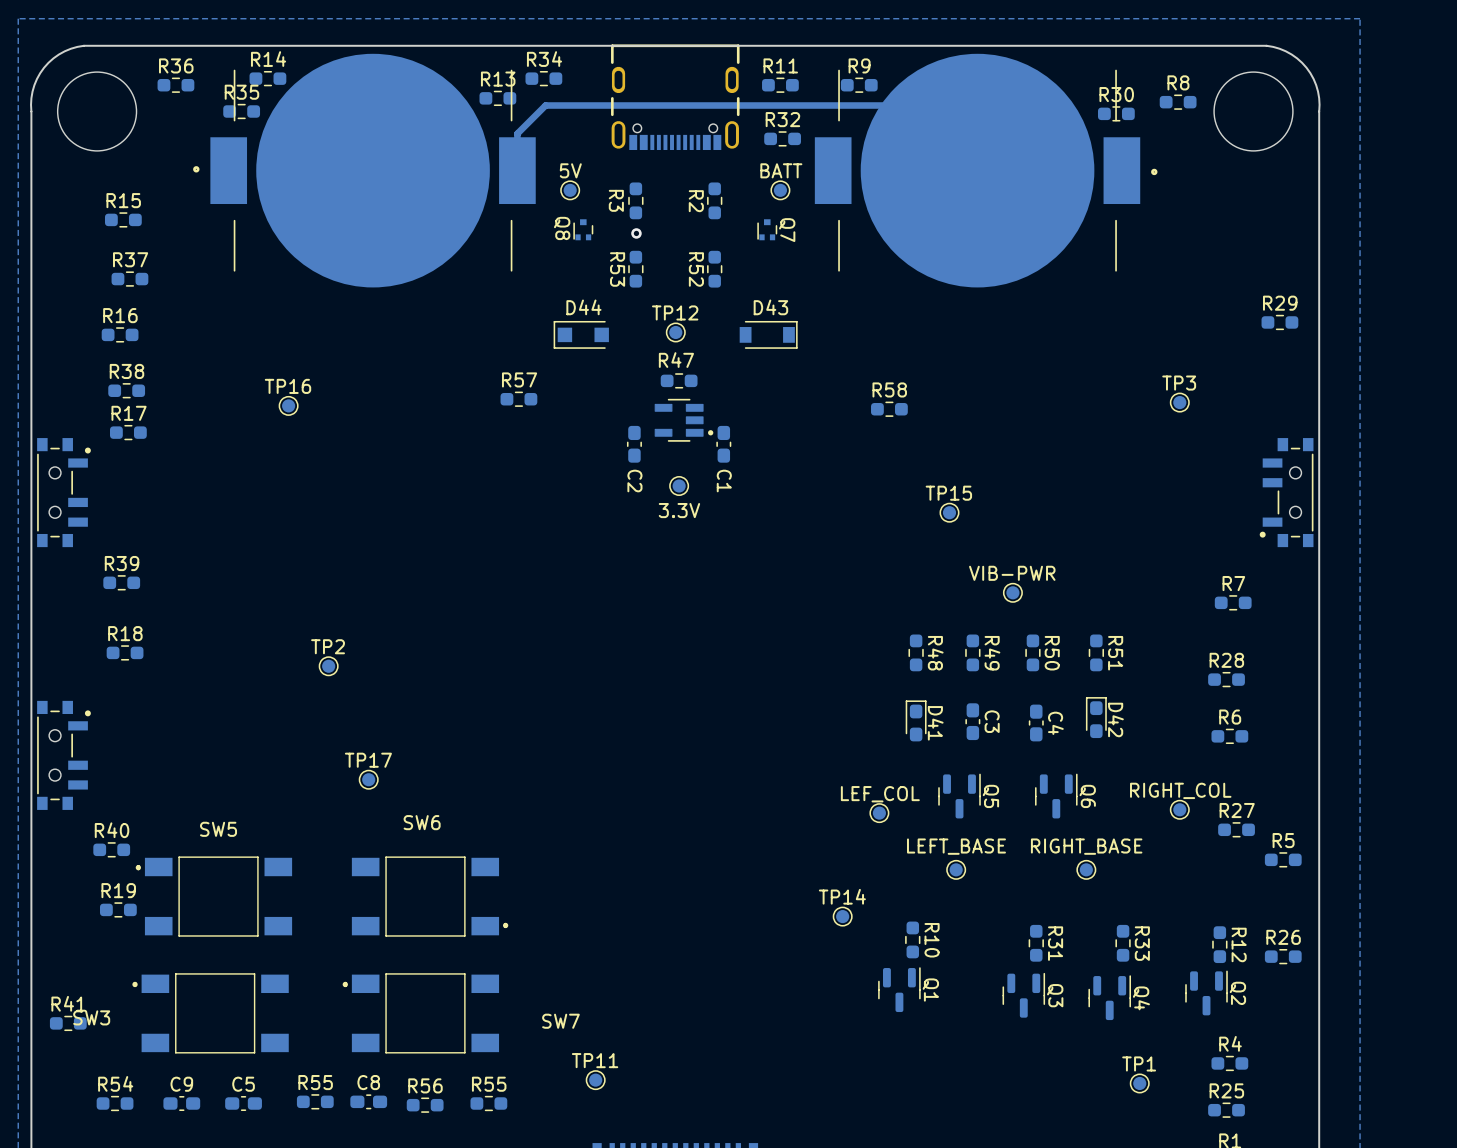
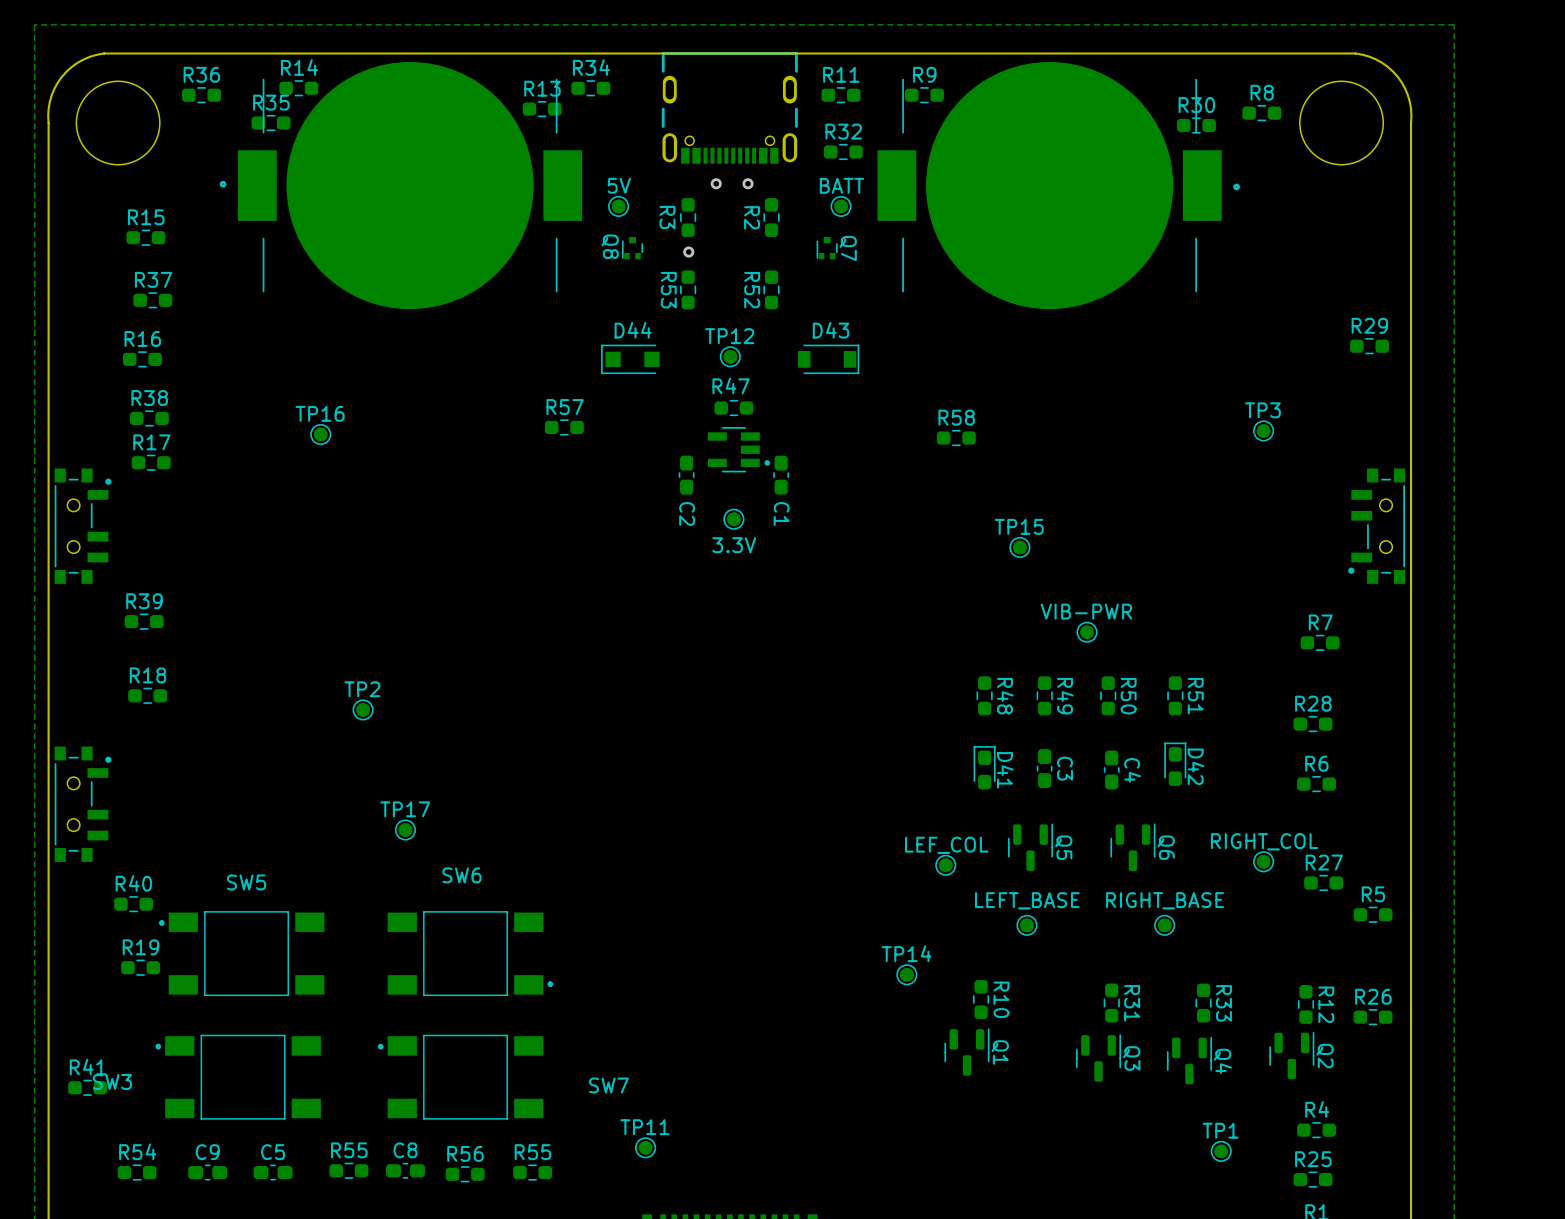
via: none -> (716, 183)
via: none -> (748, 183)
track: (951, 170) (886, 105) (545, 105) (517, 133) (517, 170) -> none

